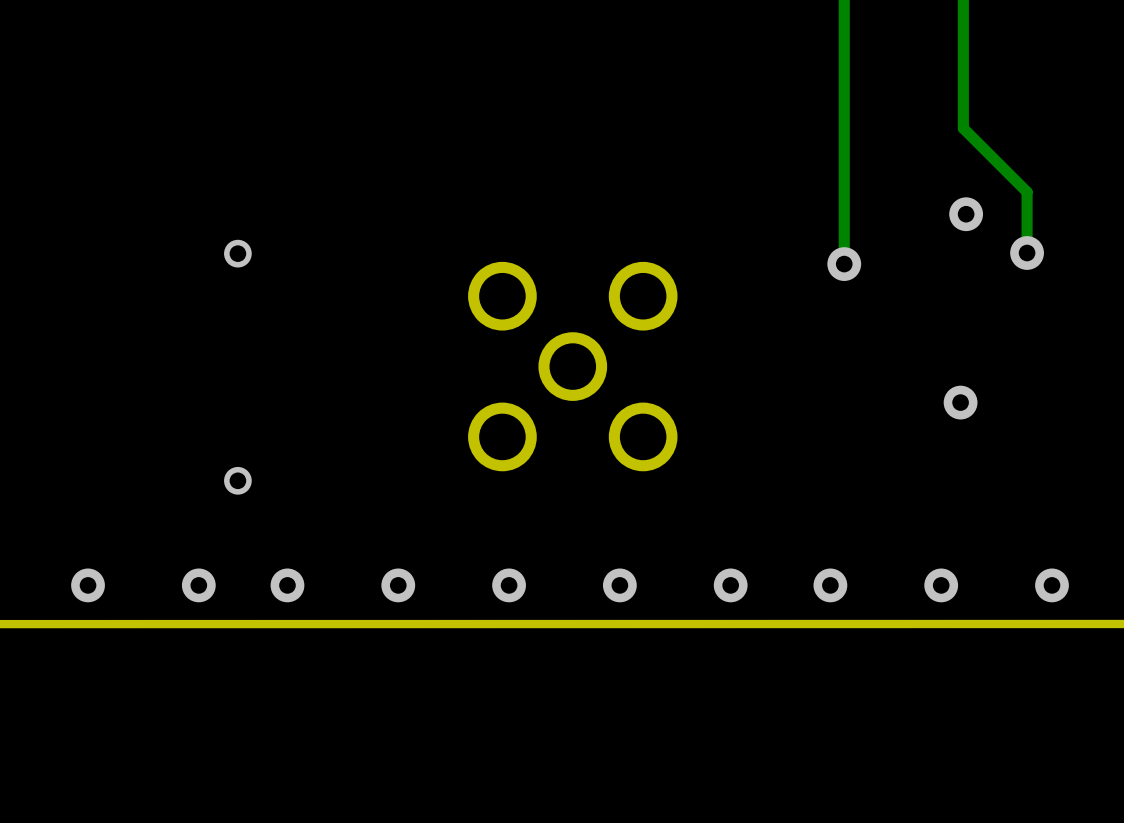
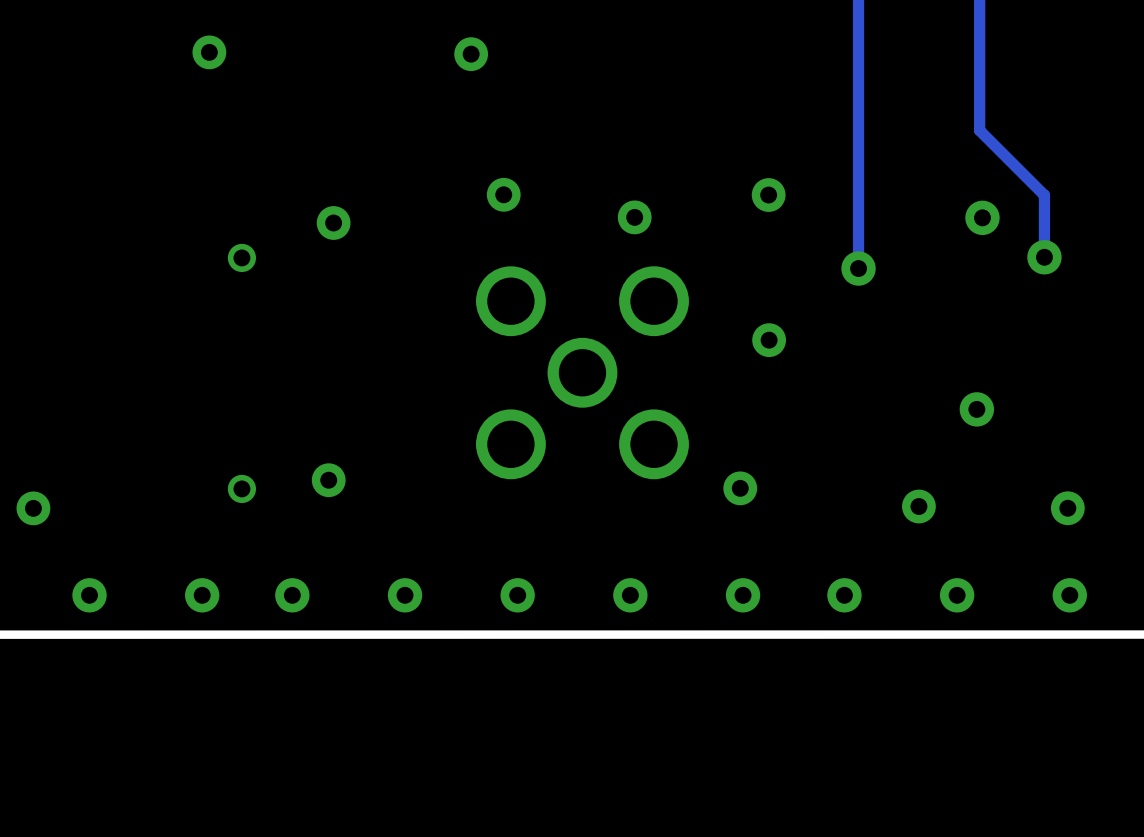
via: none -> (209, 52)
via: none -> (471, 54)
via: none -> (503, 194)
via: none -> (768, 195)
via: none -> (634, 217)
via: none -> (333, 223)
via: none -> (769, 340)
via: none -> (328, 480)
via: none -> (740, 488)
via: none -> (918, 506)
via: none -> (33, 508)
via: none -> (1067, 508)

